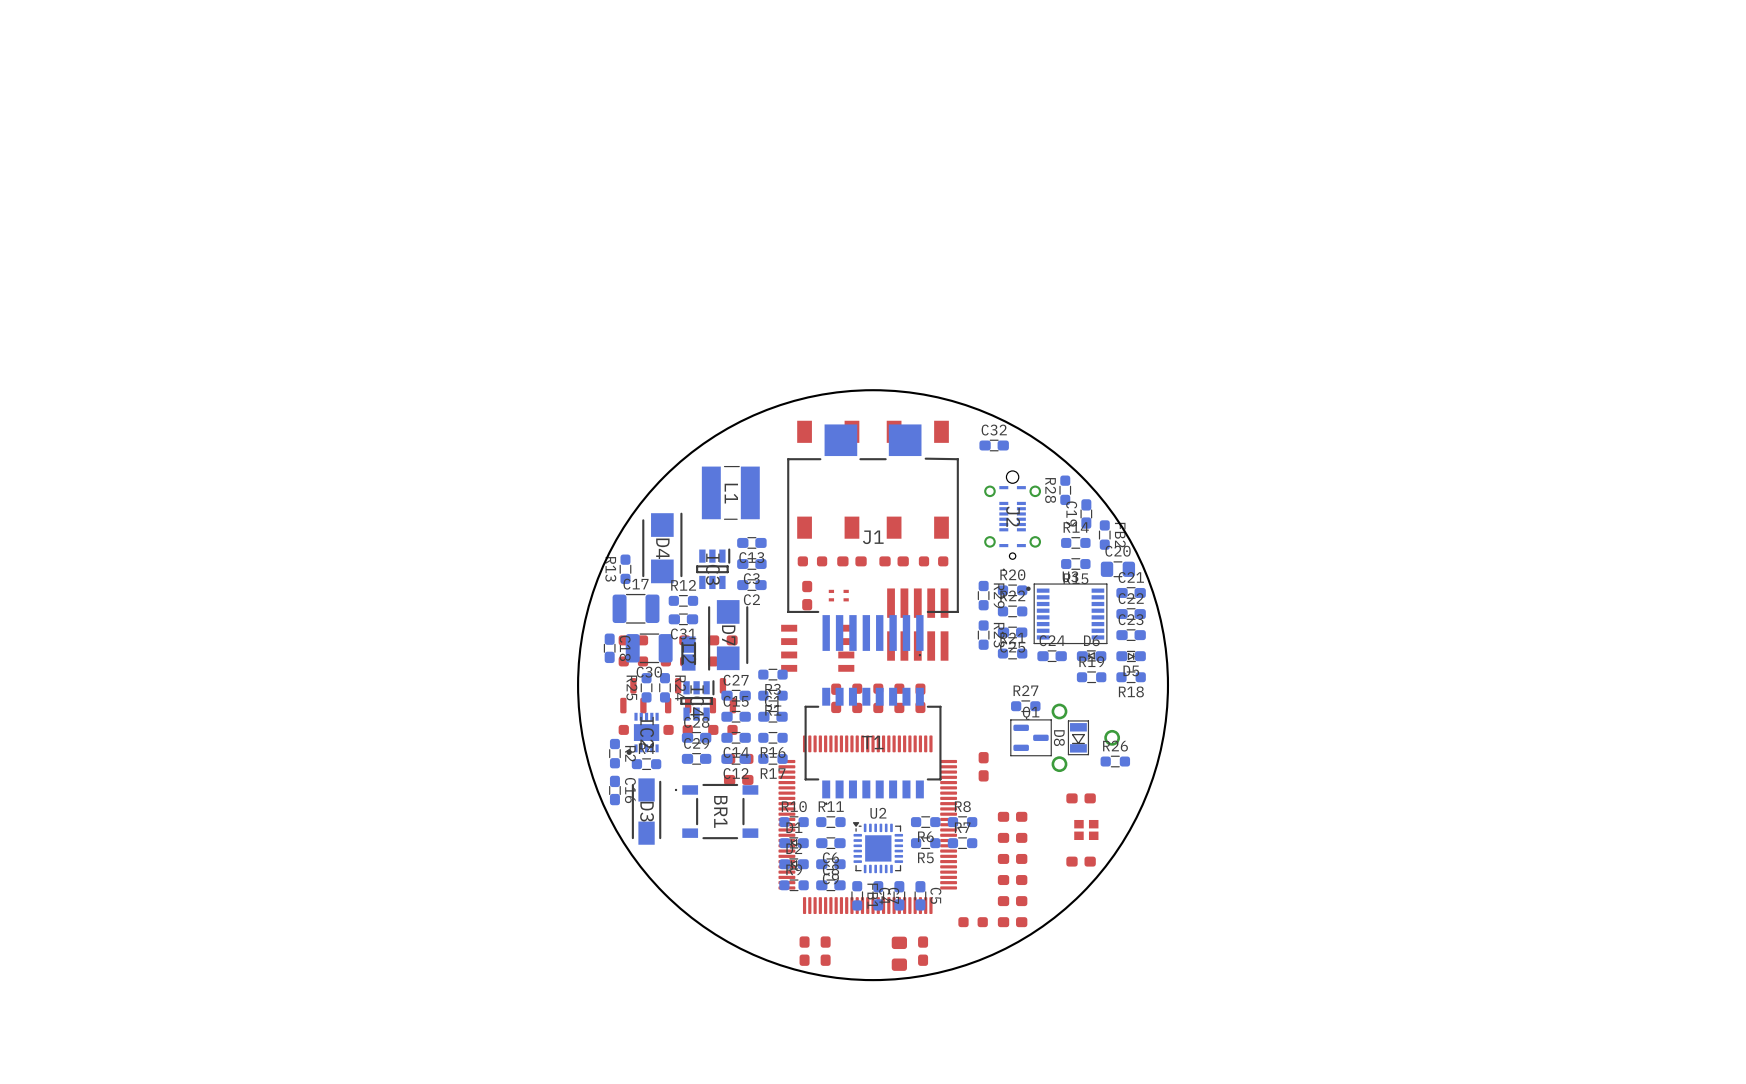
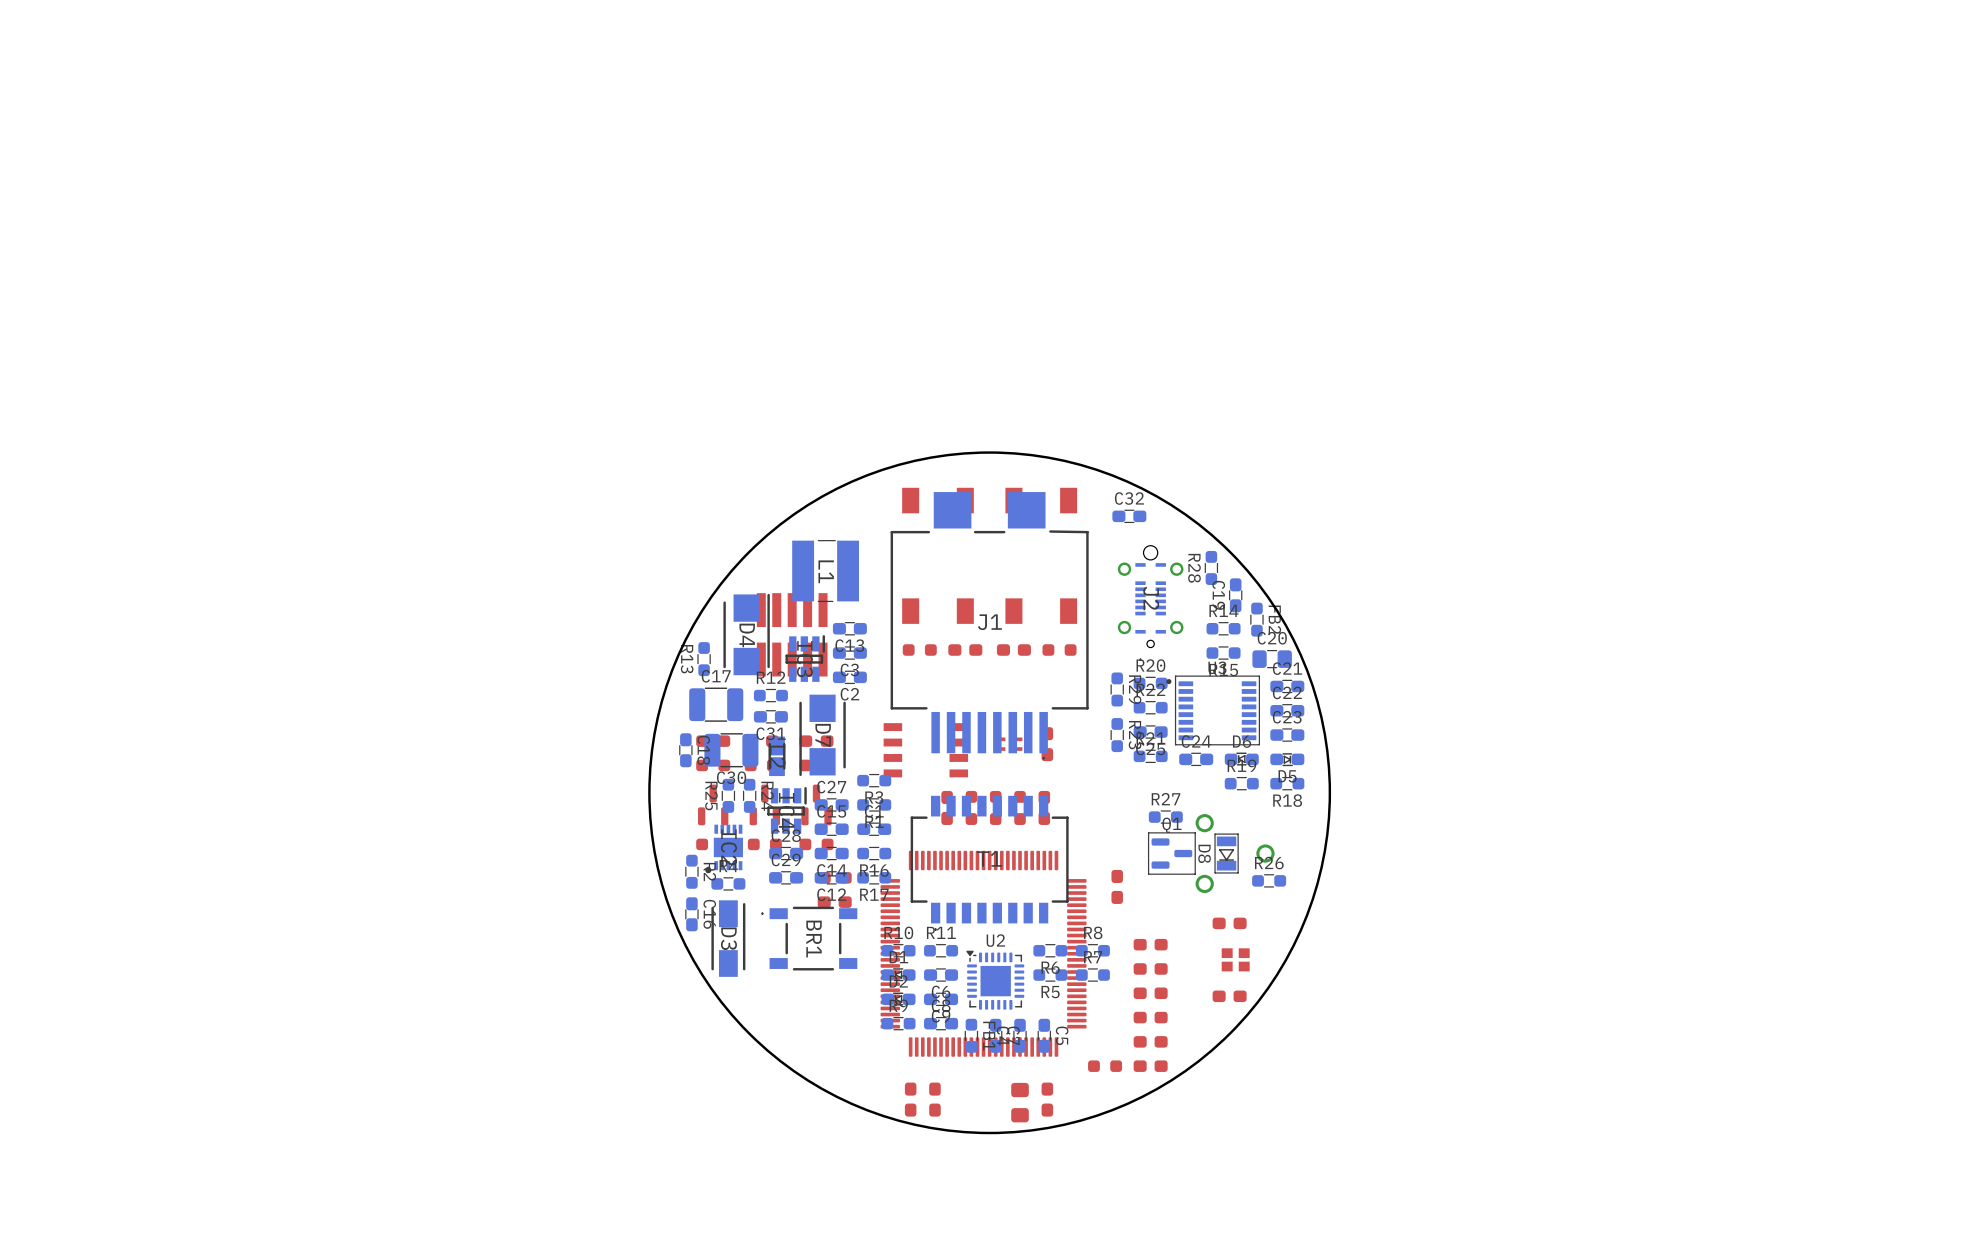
part position: (807, 595) -> (1047, 744)
part position: (838, 595) -> (1010, 744)
part position: (917, 624) -> (792, 634)

